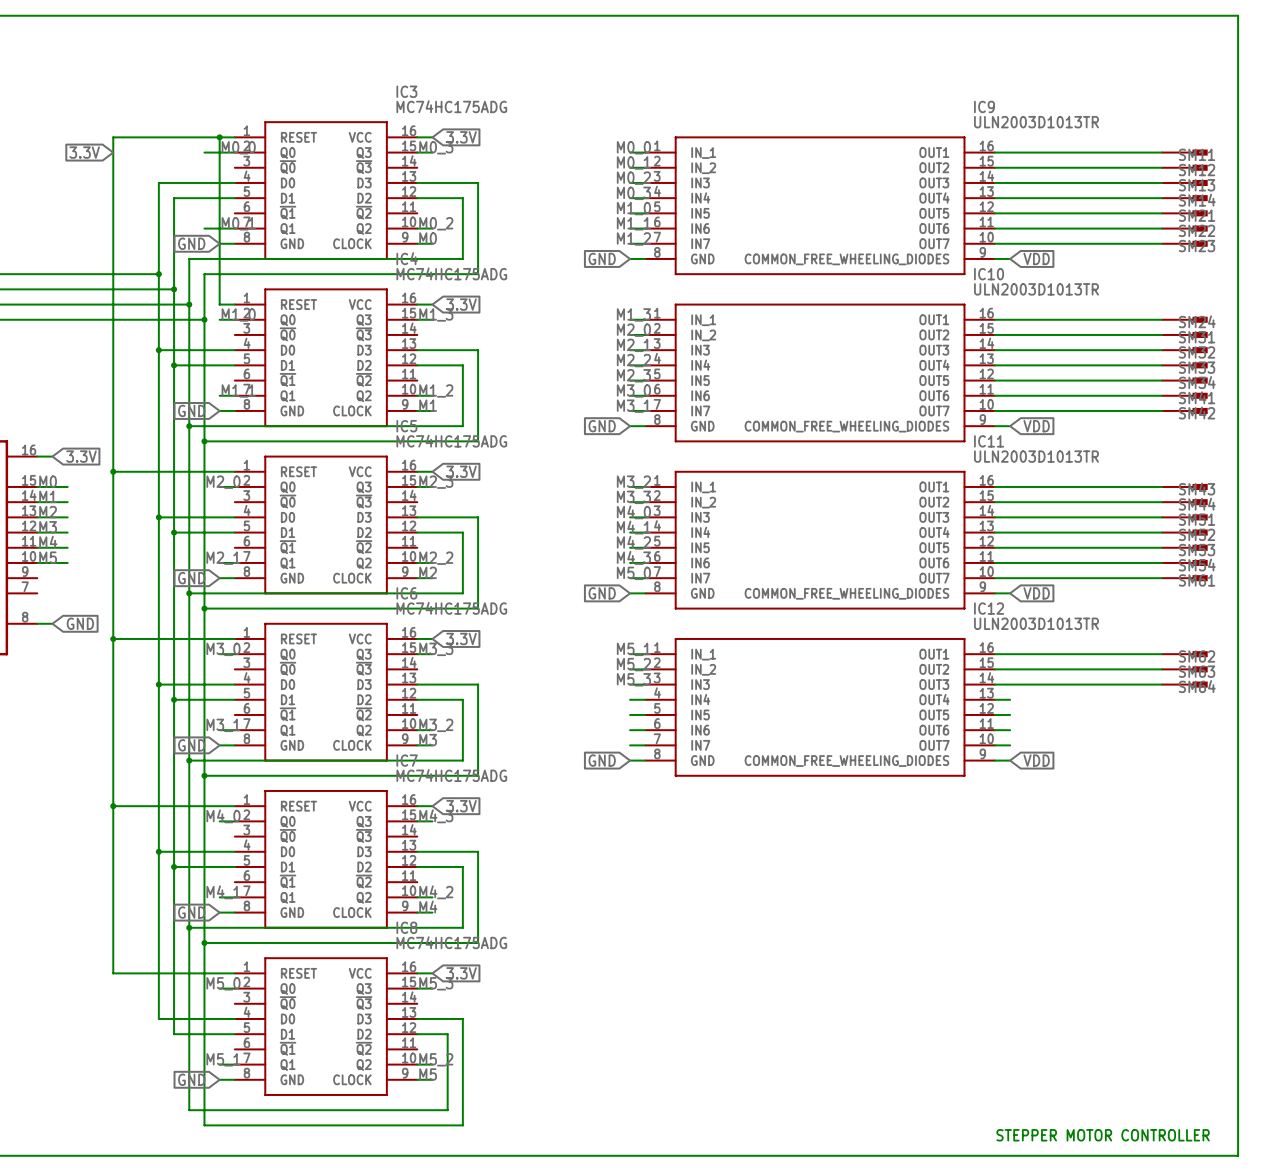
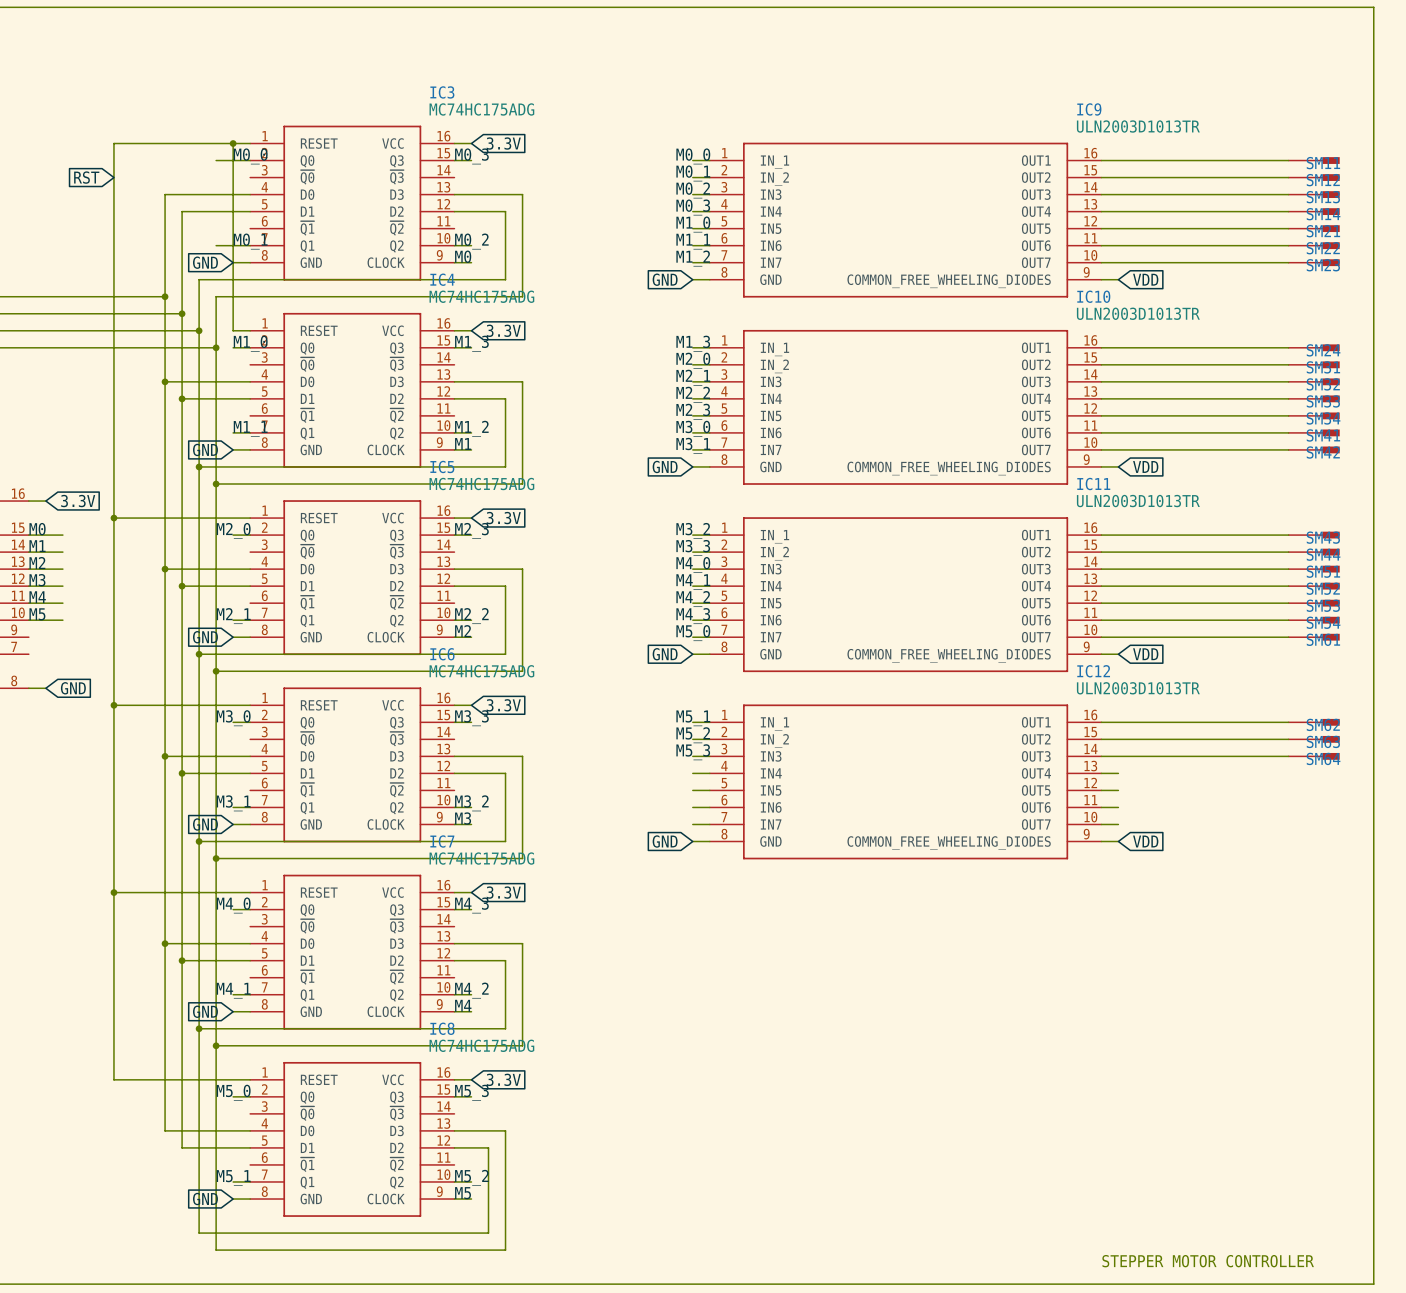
global label: 3.3V (84, 152) -> none
global label: none -> RST (86, 177)

